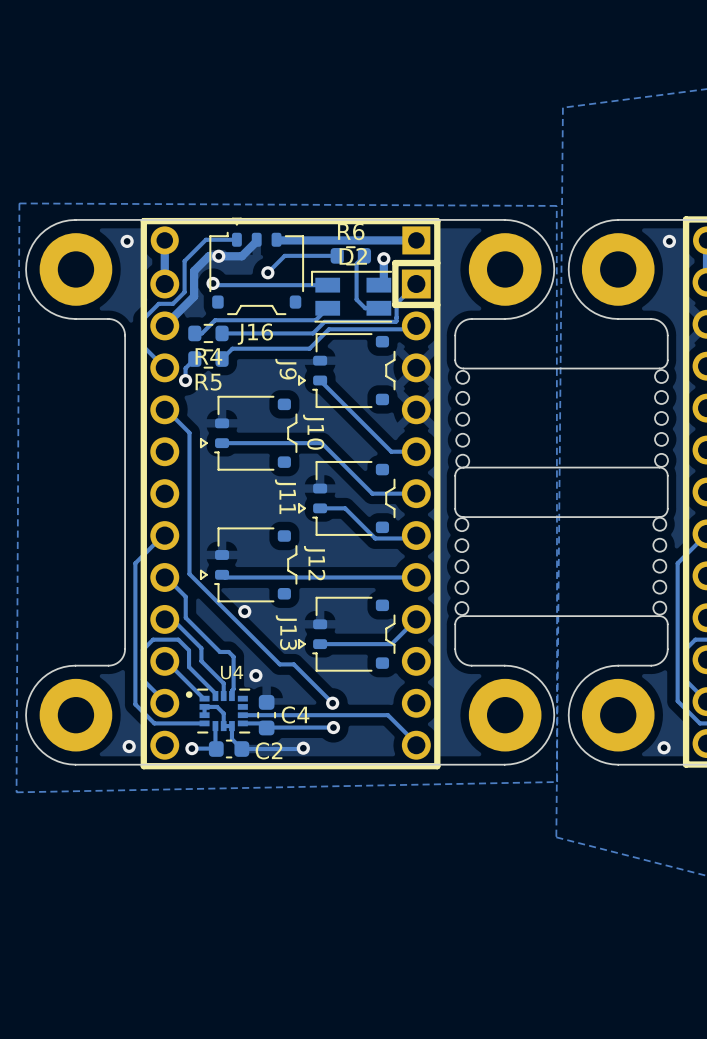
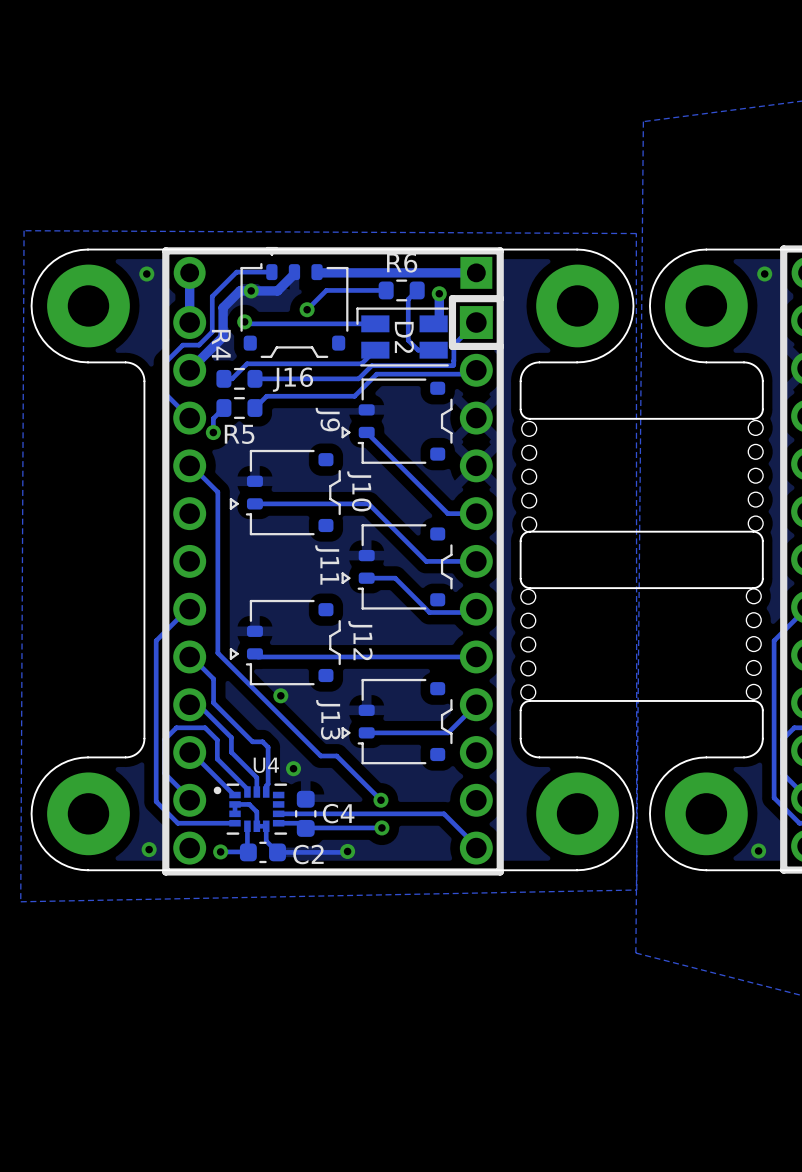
D2 name rotation: 0° (353, 256) -> 90° clockwise (404, 337)
R4 name rotation: 0° (208, 356) -> 90° clockwise (221, 345)
R4 name position: R4 (208, 356) -> R4 (221, 345)

